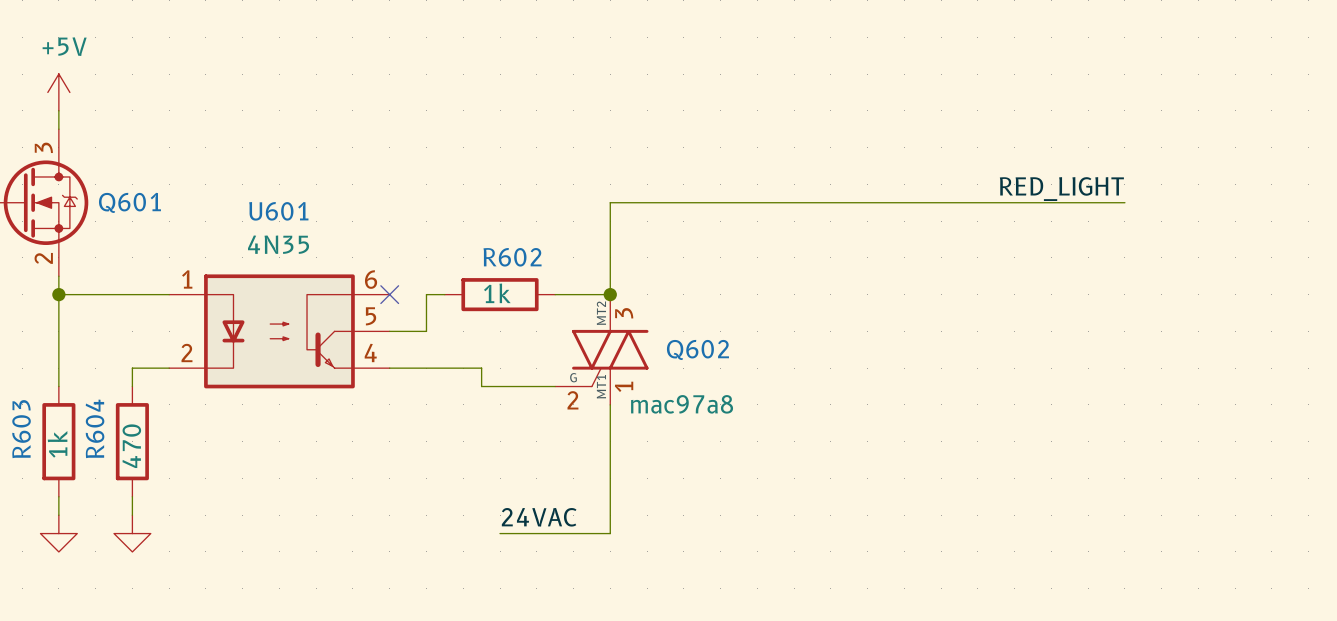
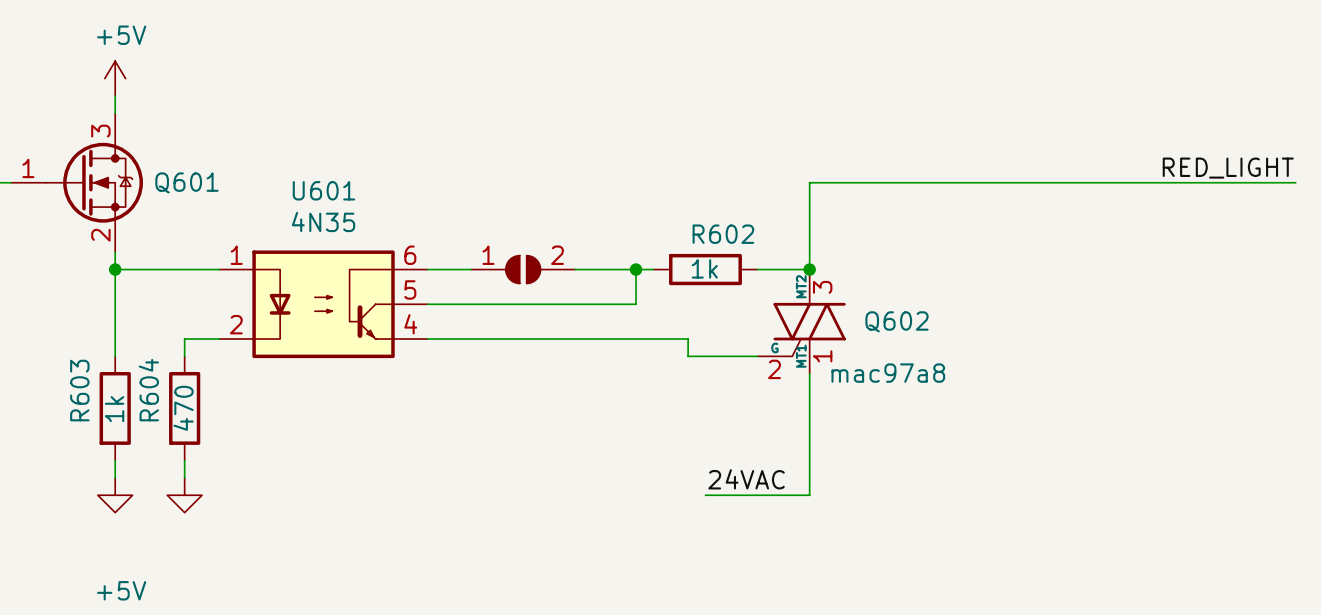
label position: RED_LIGHT (1061, 189) -> RED_LIGHT (1228, 168)
wire: (794, 202) (610, 202) (610, 294) -> (809, 182) (809, 269) (757, 269)
wire: none -> (1122, 182) (1295, 182)
no-connect mark: (389, 294) -> none
wire: (426, 294) (426, 331) -> (462, 269) (427, 269)
part: none -> (523, 269)
R602 position: (500, 294) -> (705, 269)
wire: none -> (653, 269) (636, 269) (636, 304) (462, 304)
junction: none -> (809, 269)
Q602 position: (601, 349) -> (801, 321)
wire: (481, 368) (481, 386) (555, 386) -> (514, 339) (688, 339) (688, 356) (757, 356)
wire: (610, 404) (610, 533) (500, 533) -> (809, 373) (809, 495) (705, 495)
label position: 24VAC (539, 517) -> 24VAC (746, 479)

